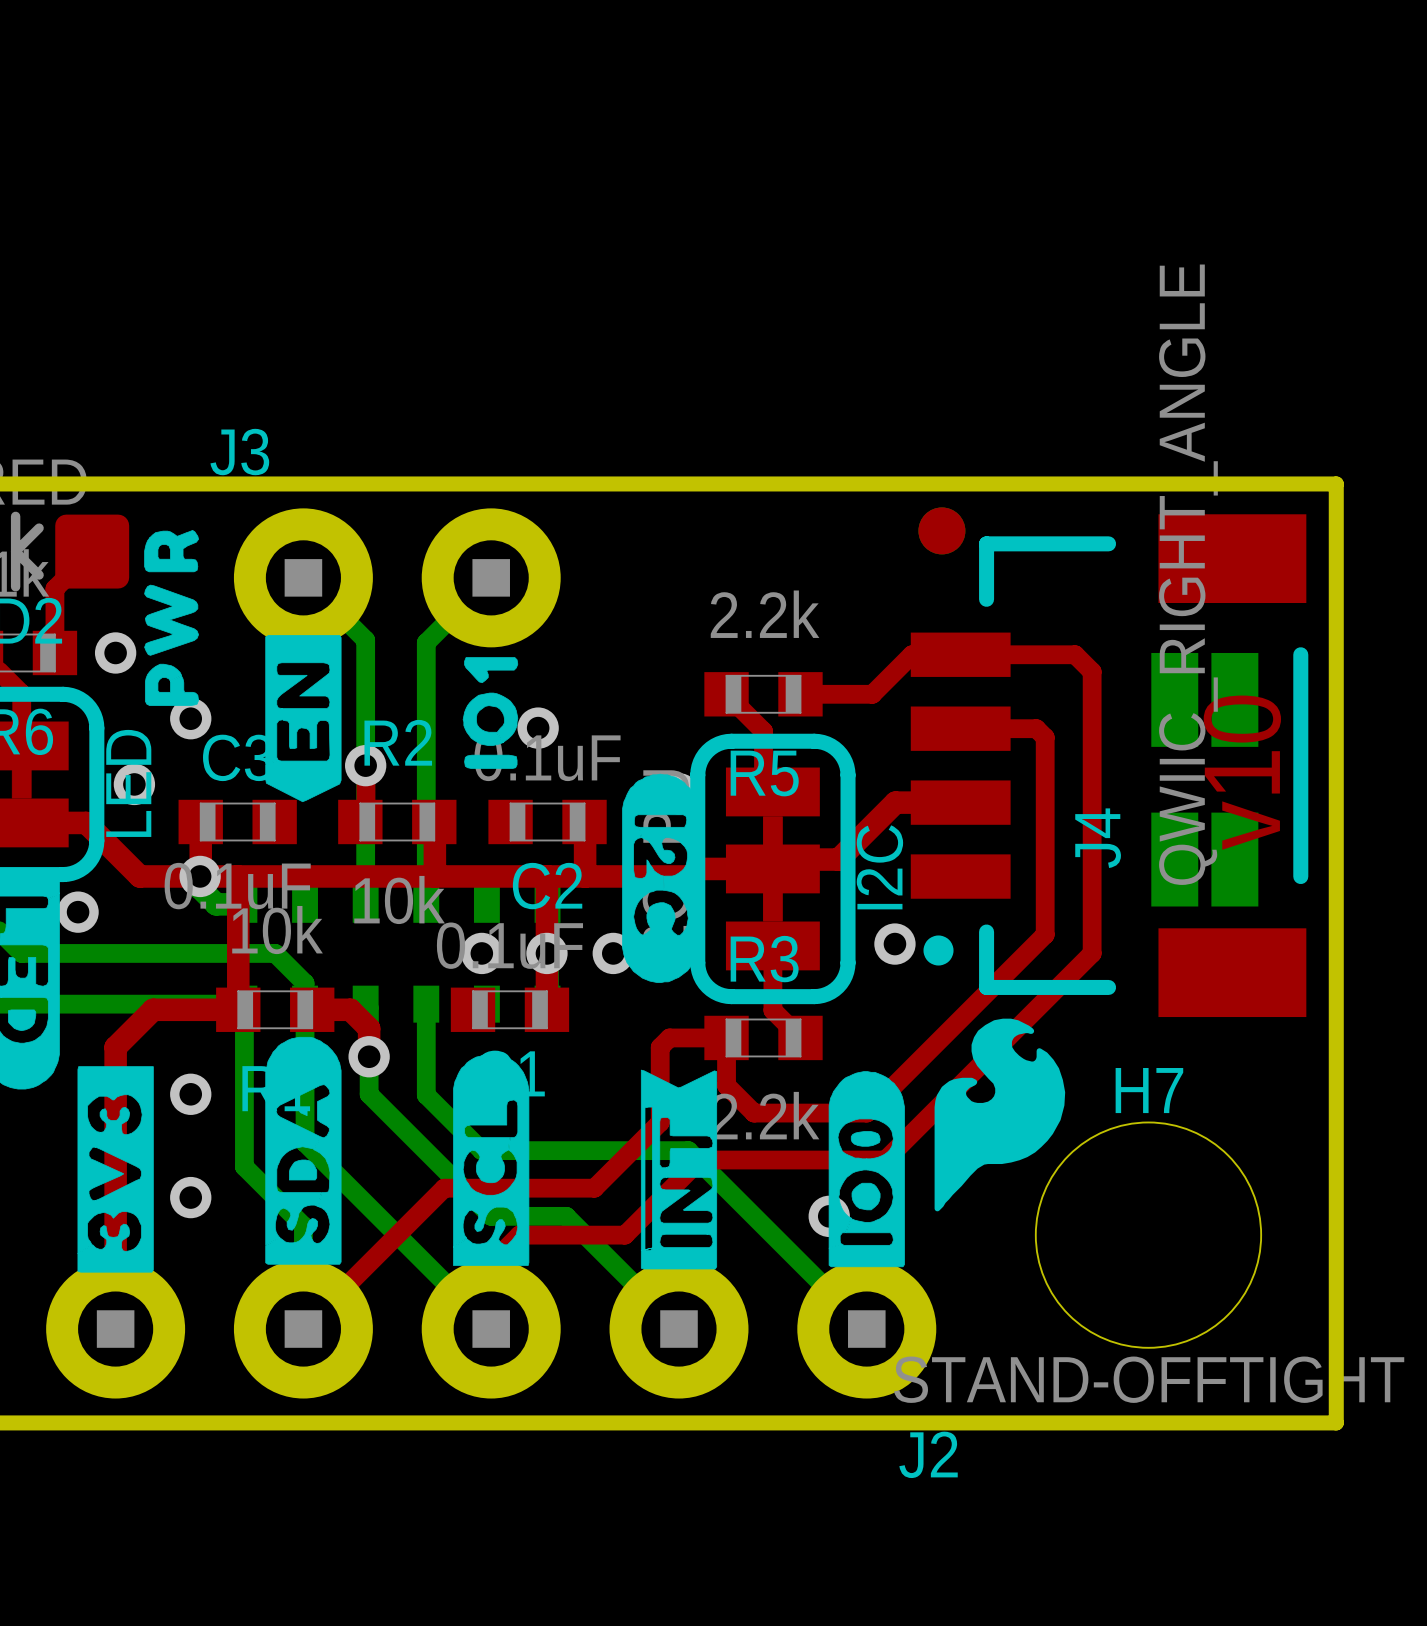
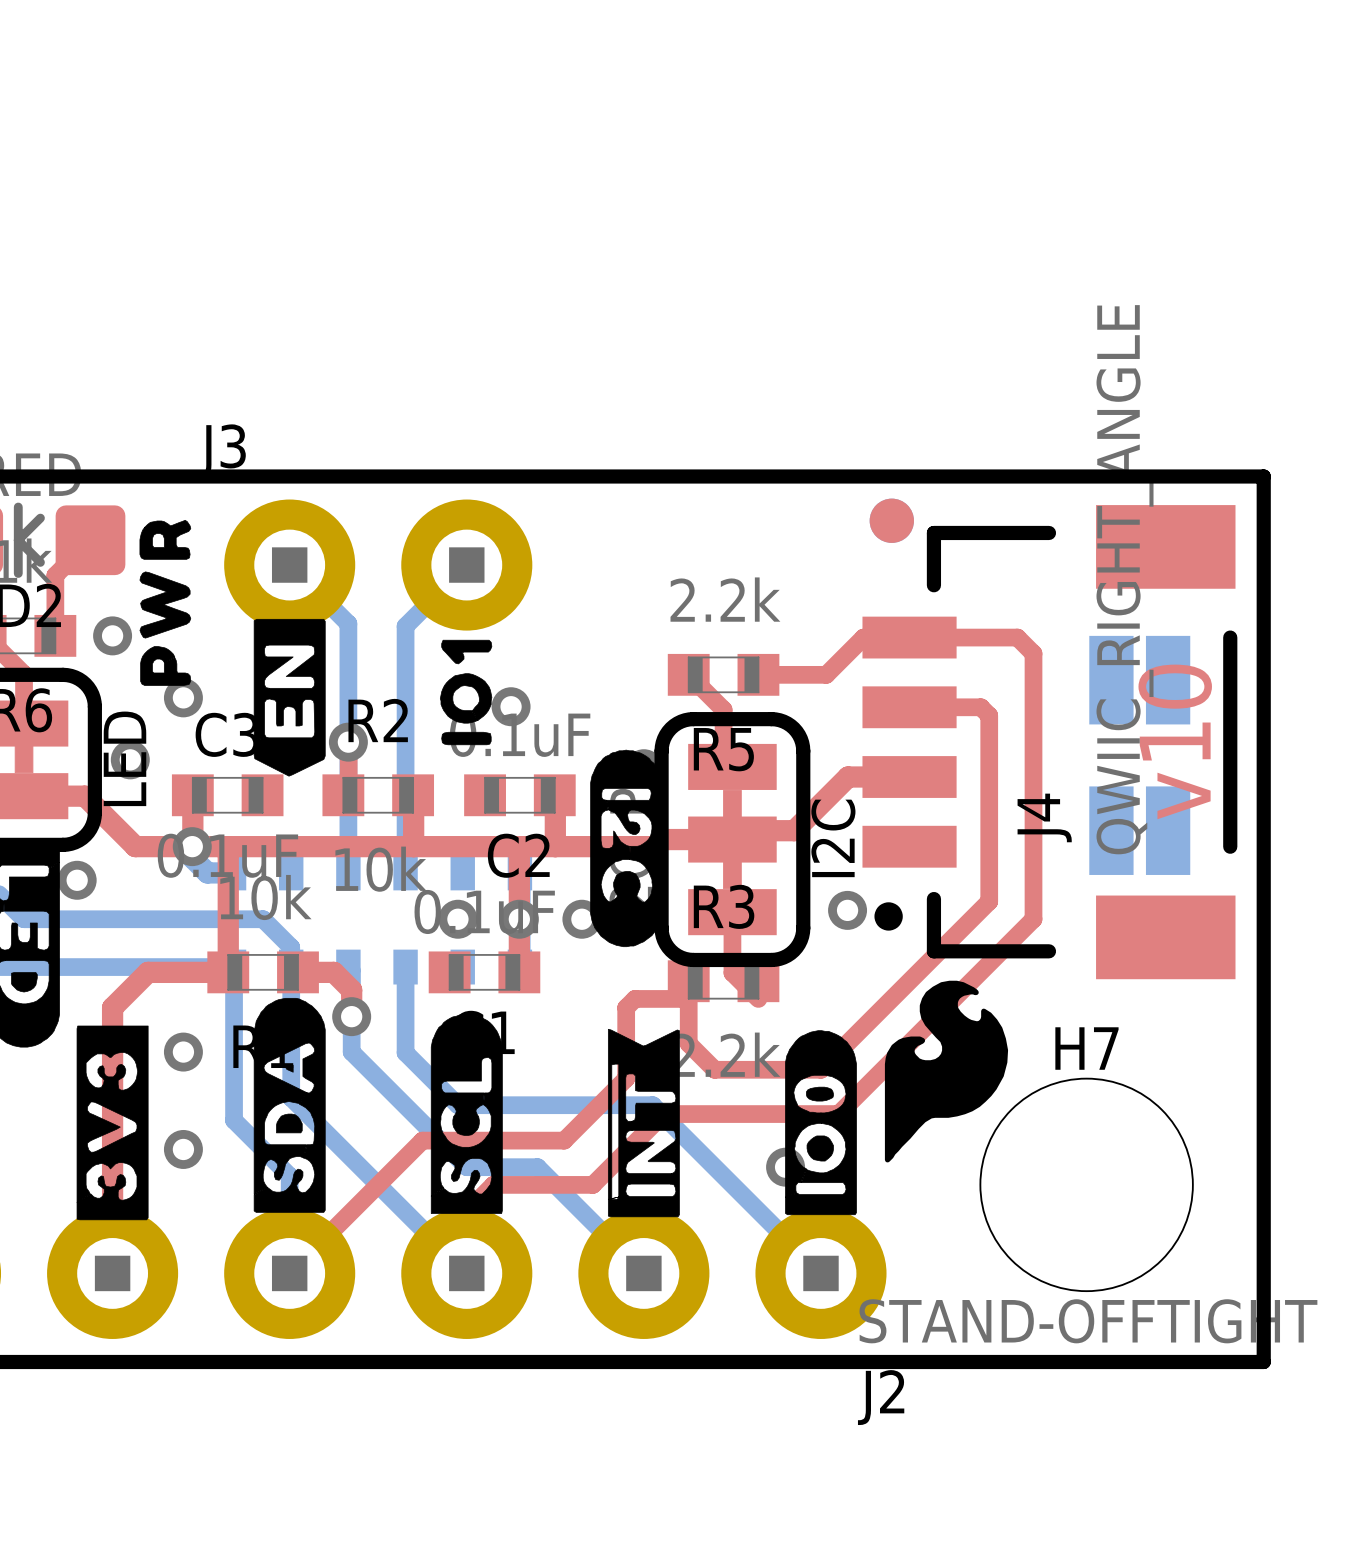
R3 position: (763, 1037) -> (723, 981)

